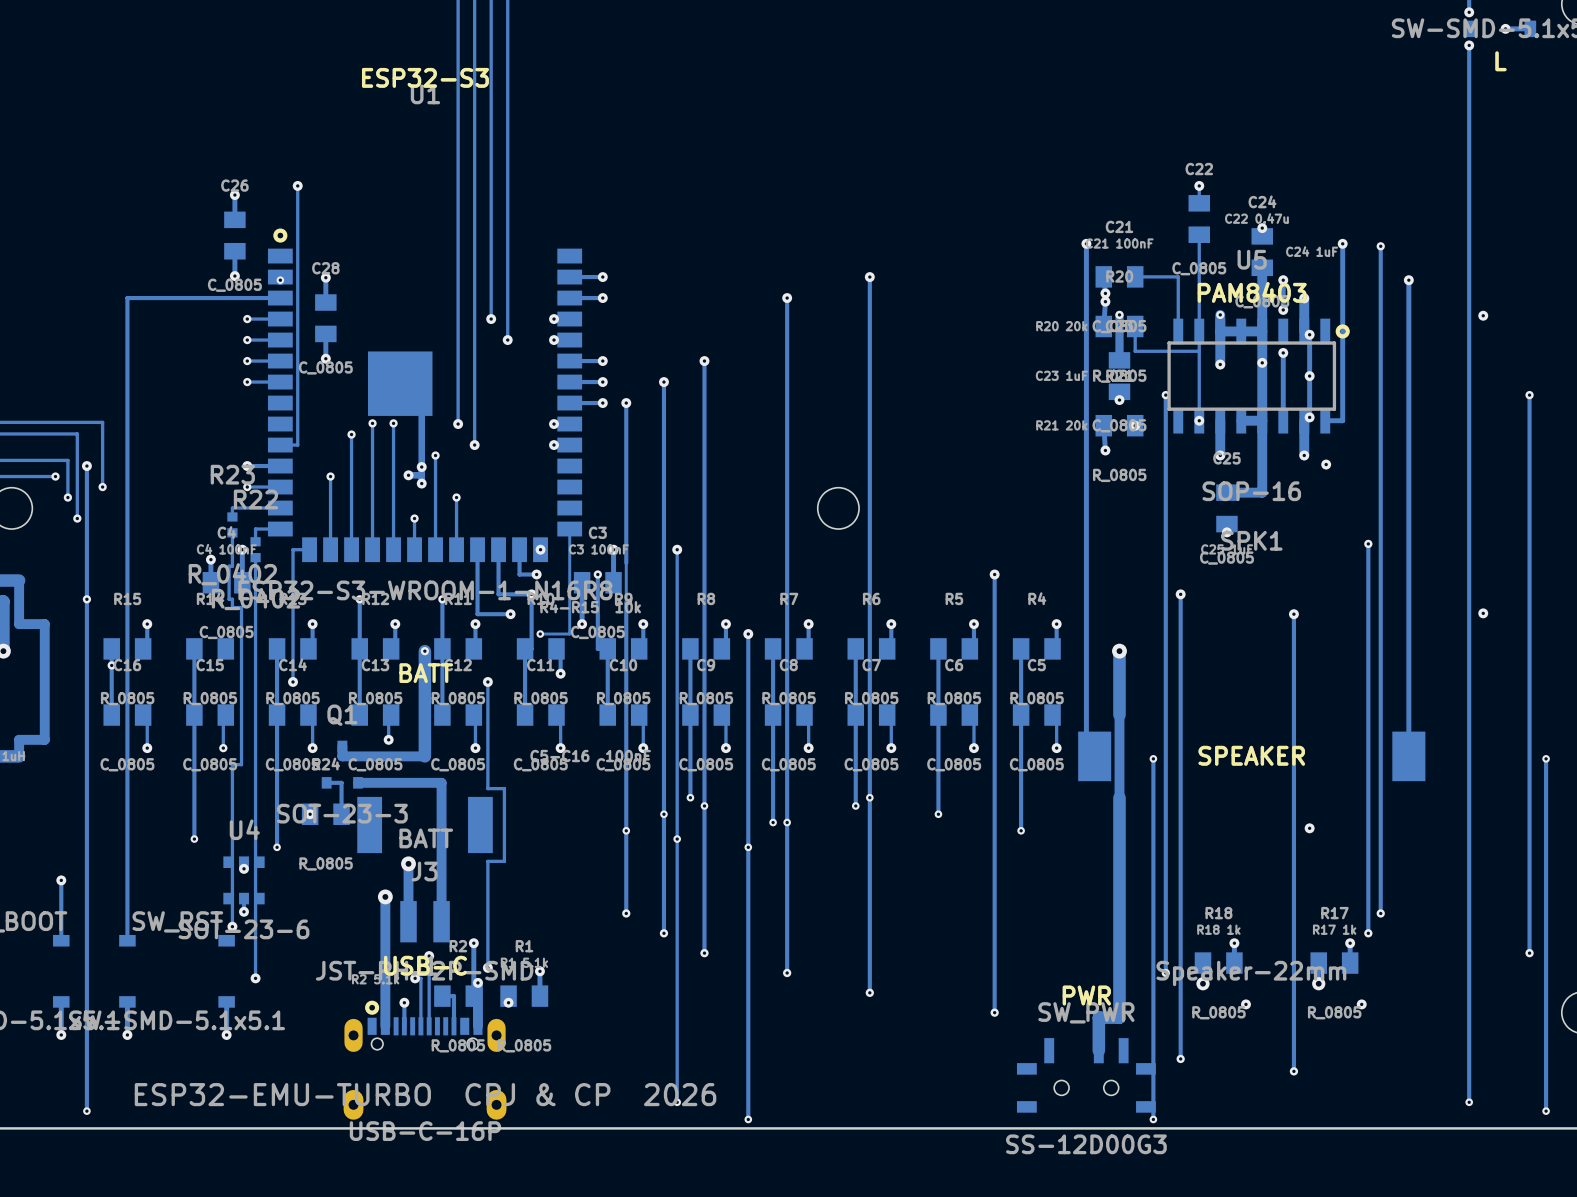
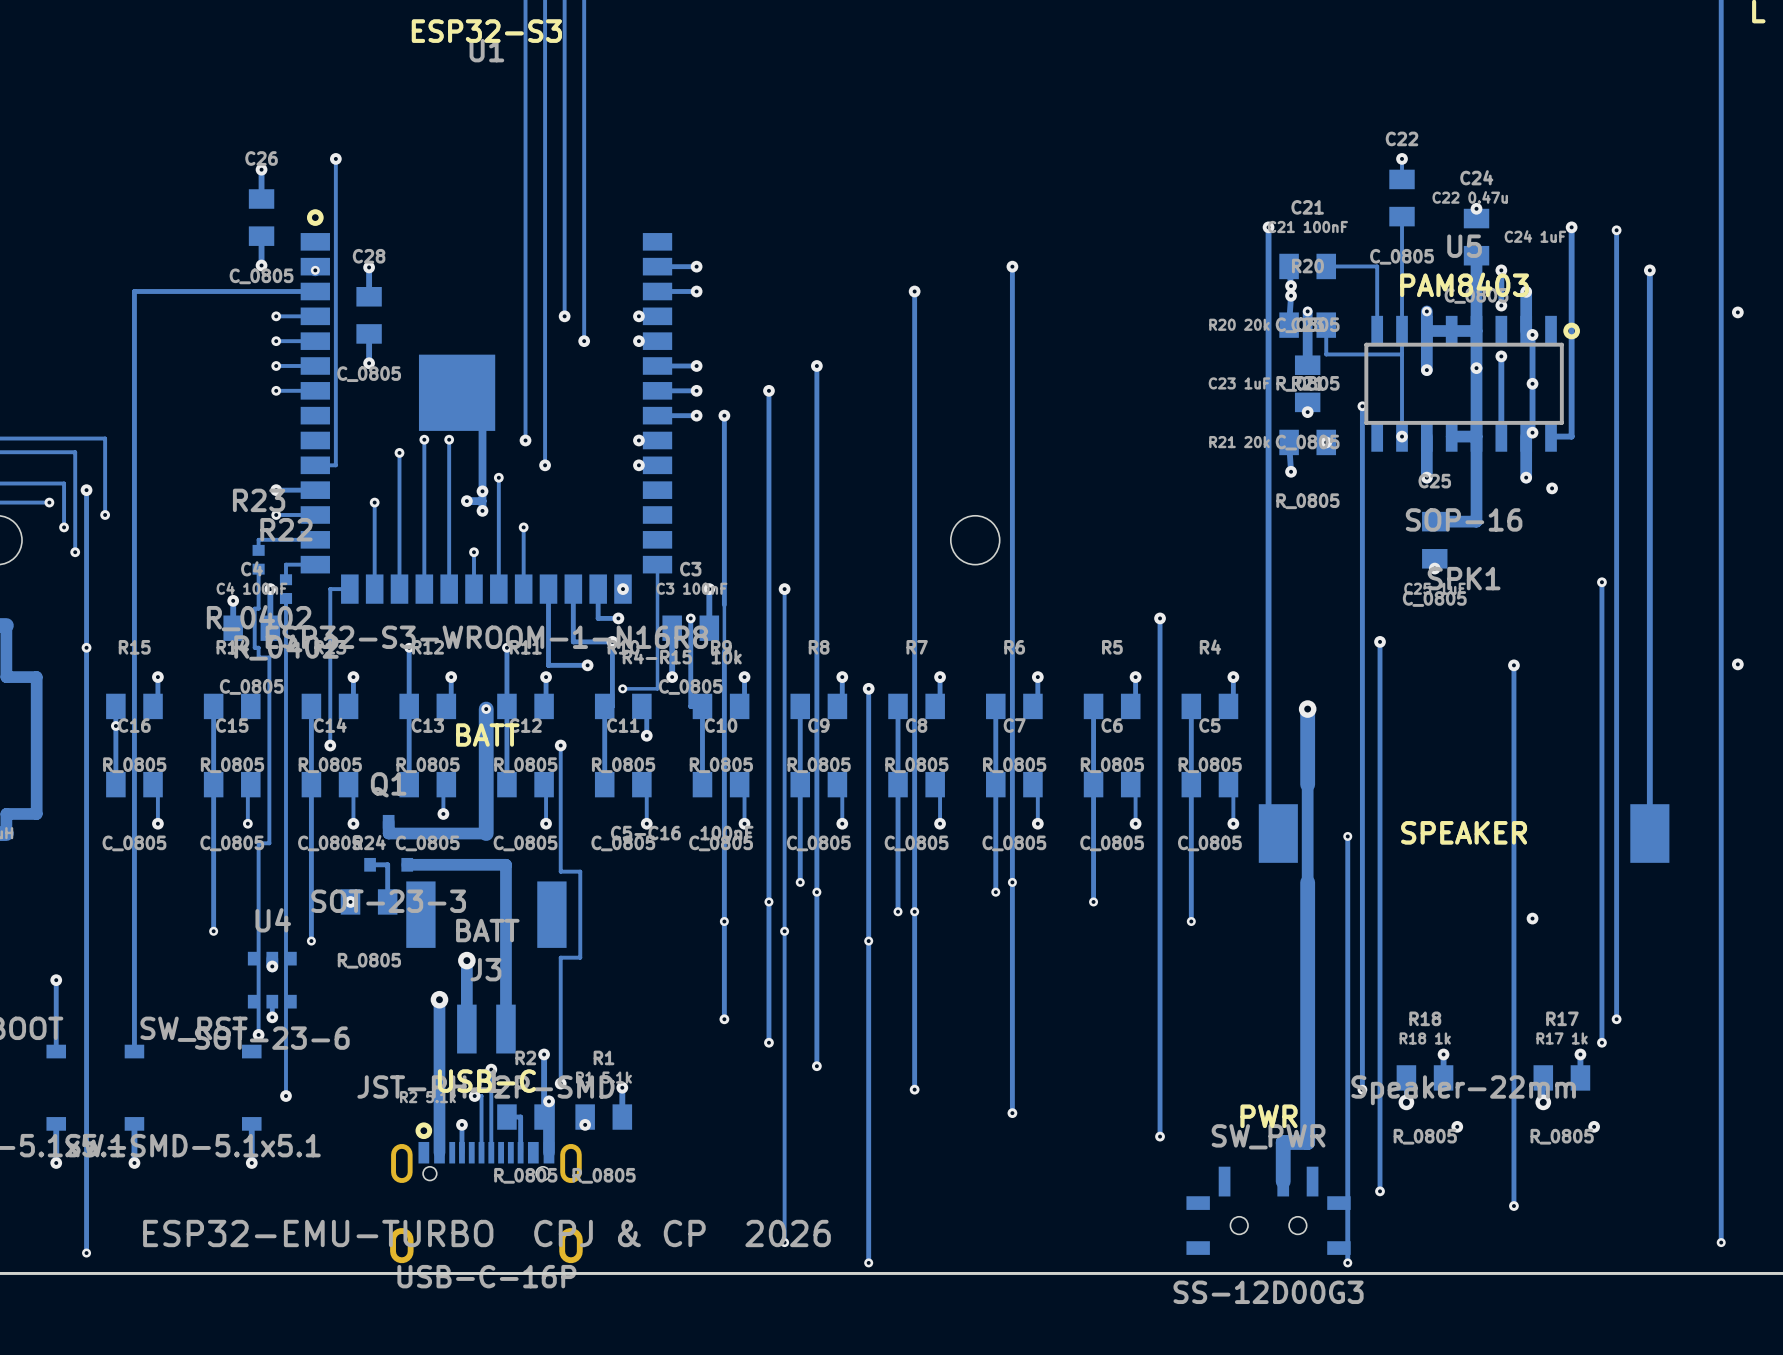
part footprint: [343, 1000, 507, 1120] -> [390, 1122, 583, 1264]

